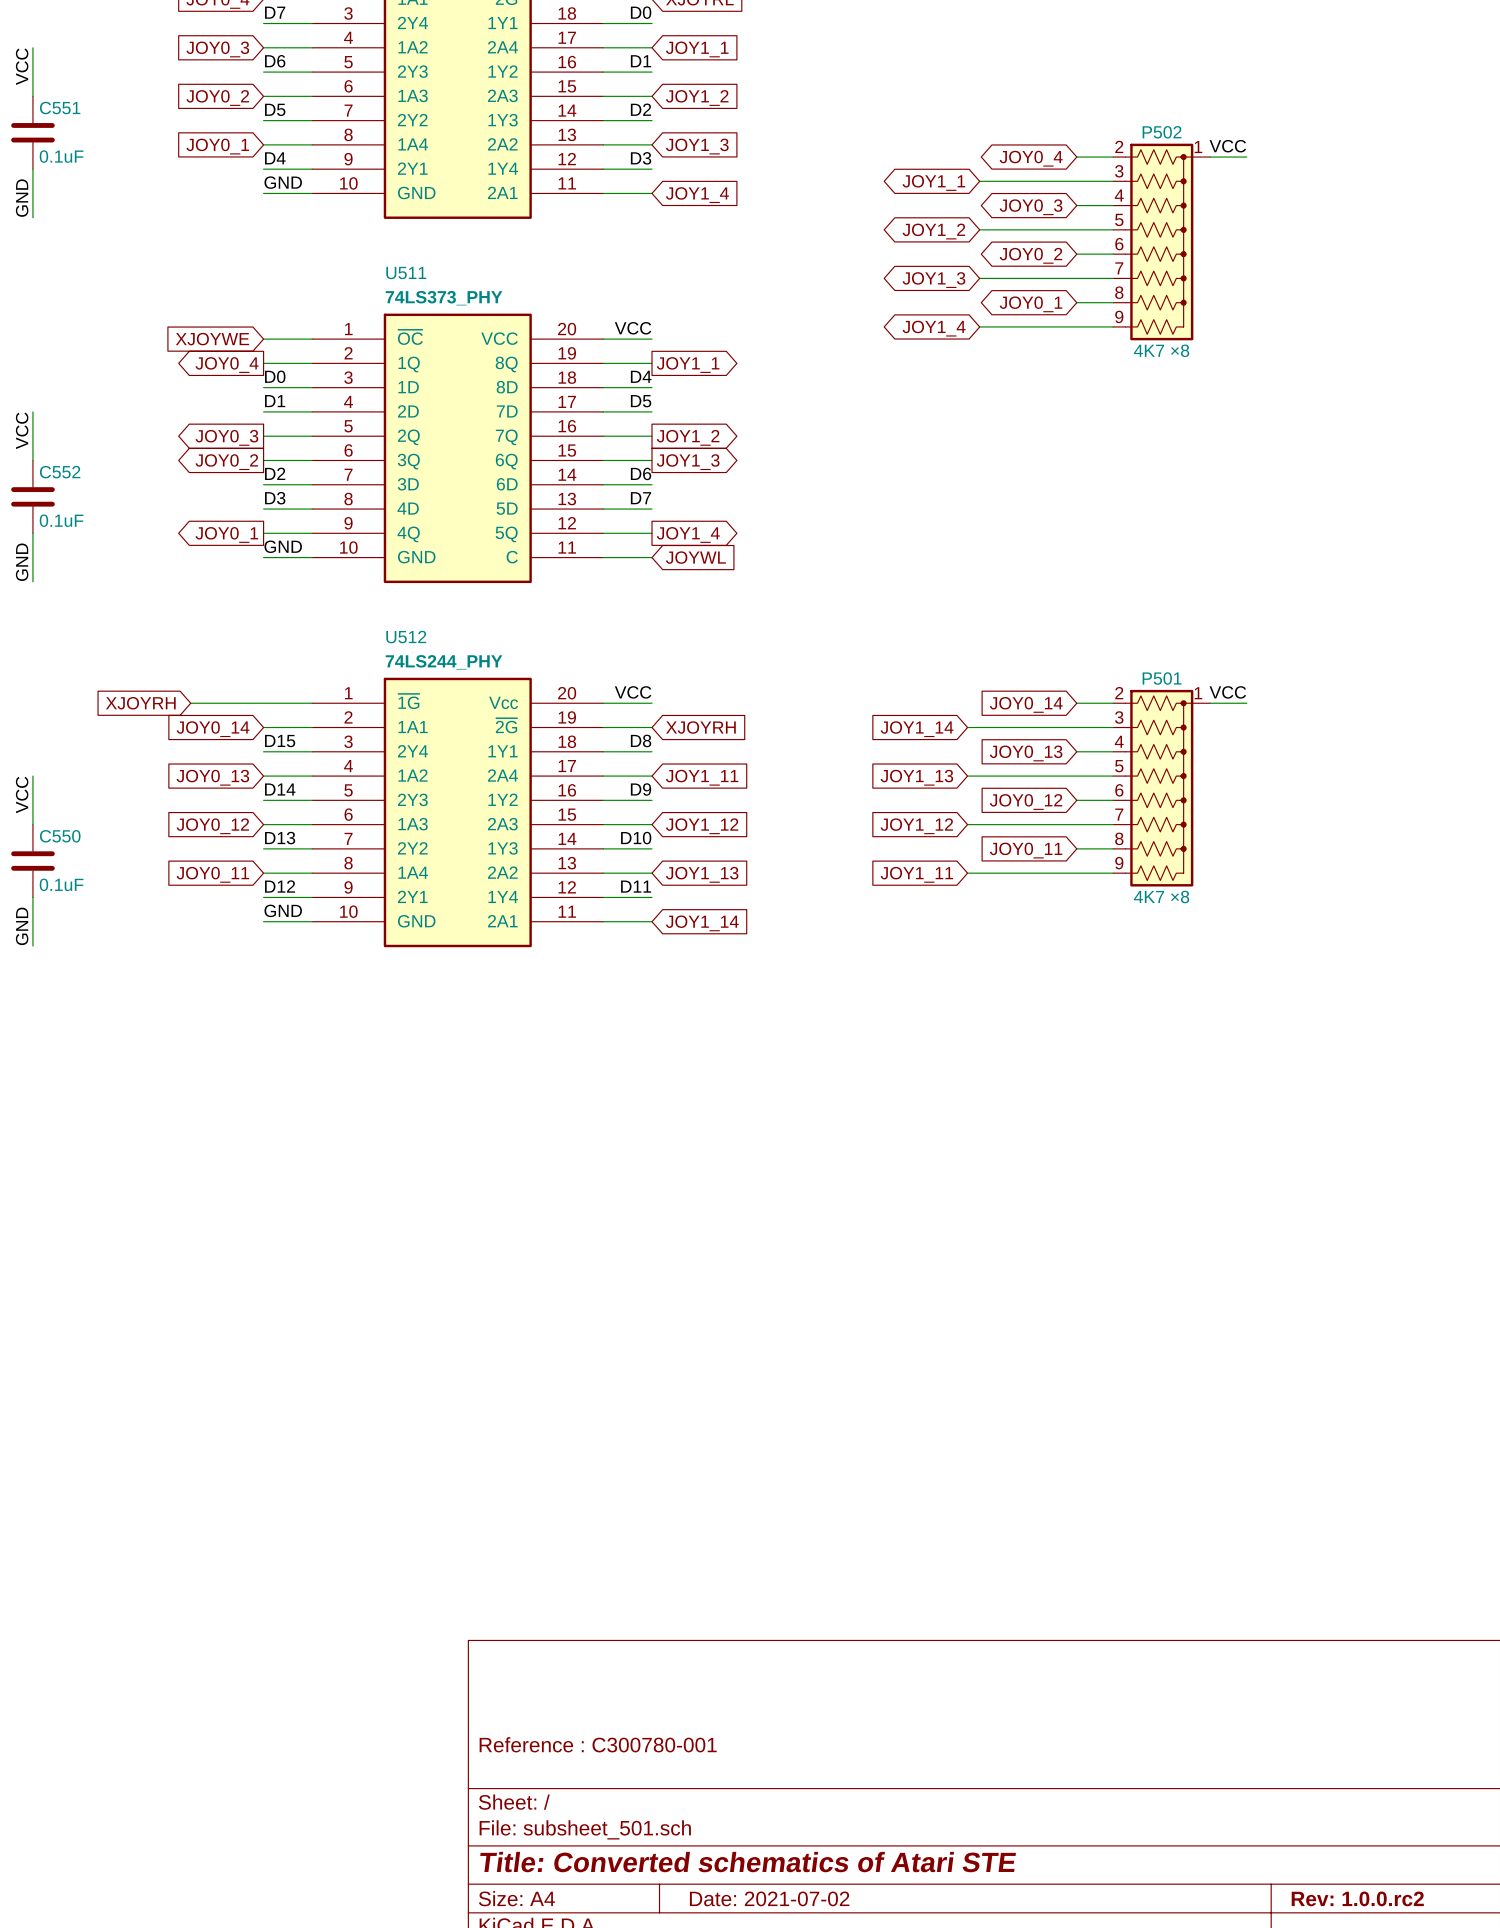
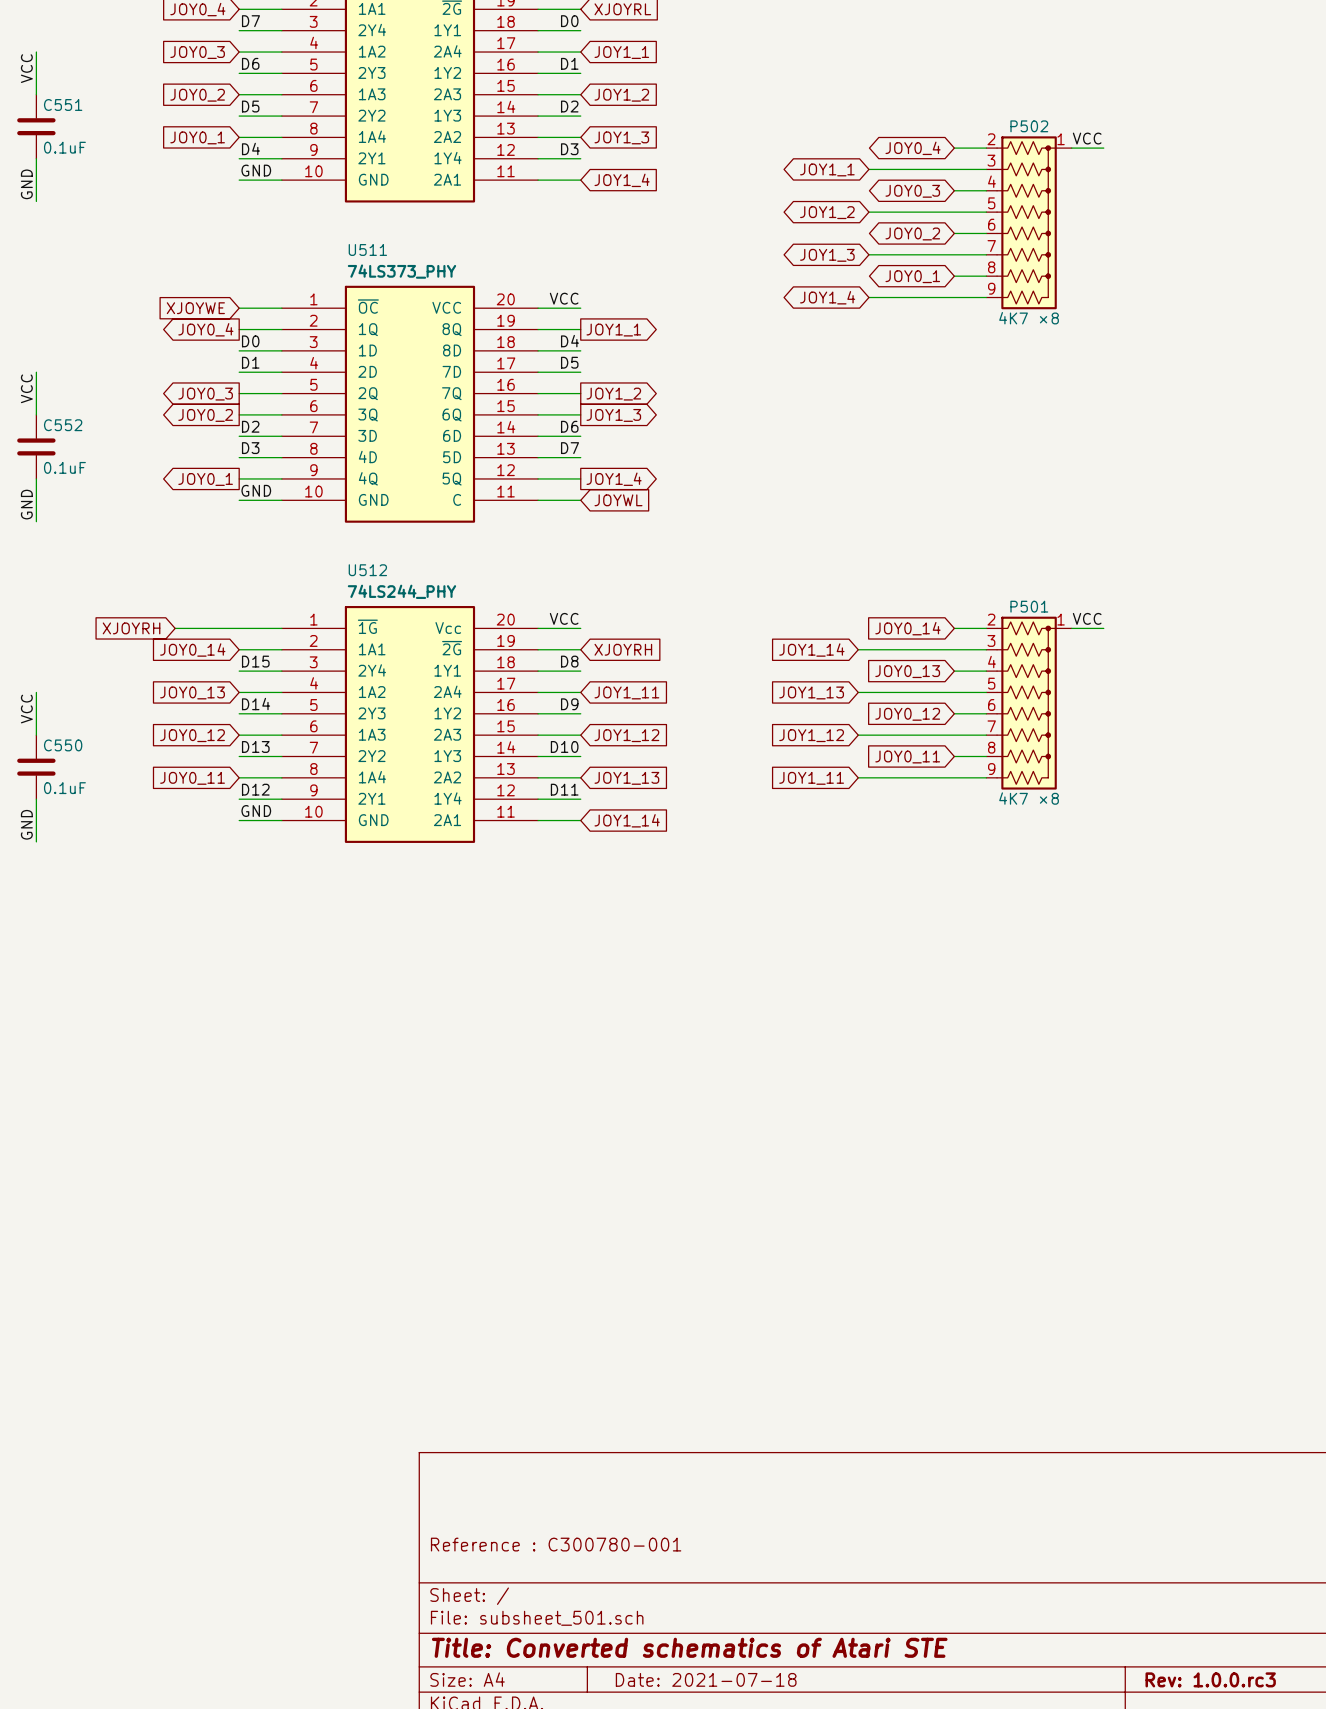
title block: Date: 2021-07-02 (769, 1898) -> Date: 2021-07-18 (706, 1679)
title block: Rev: 1.0.0.rc2 (1357, 1898) -> Rev: 1.0.0.rc3 (1210, 1679)

